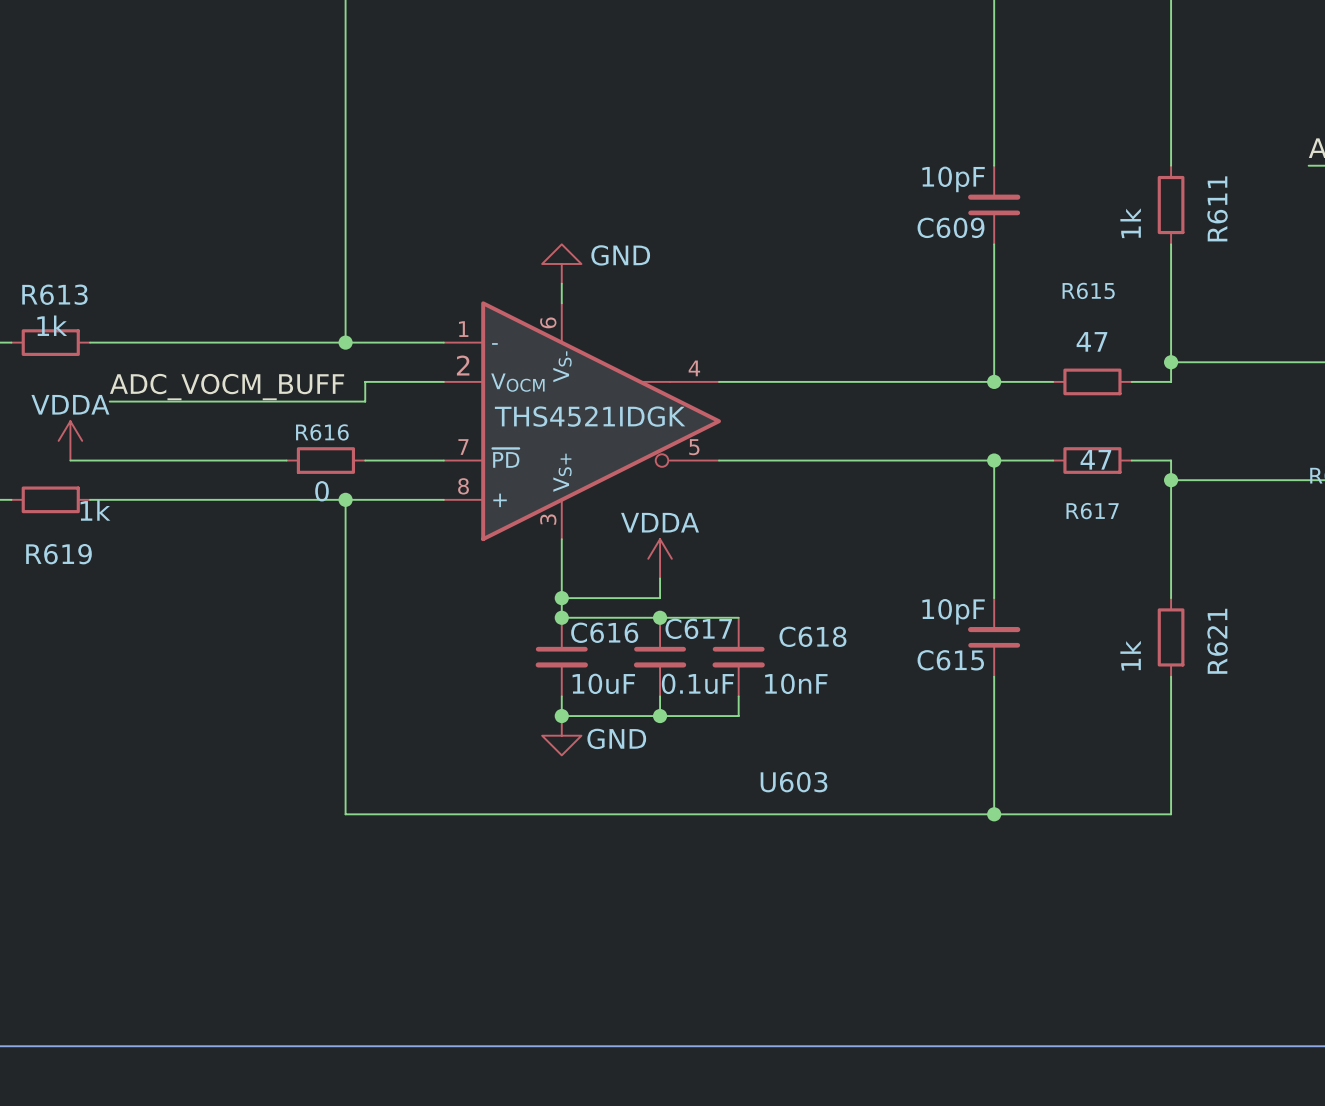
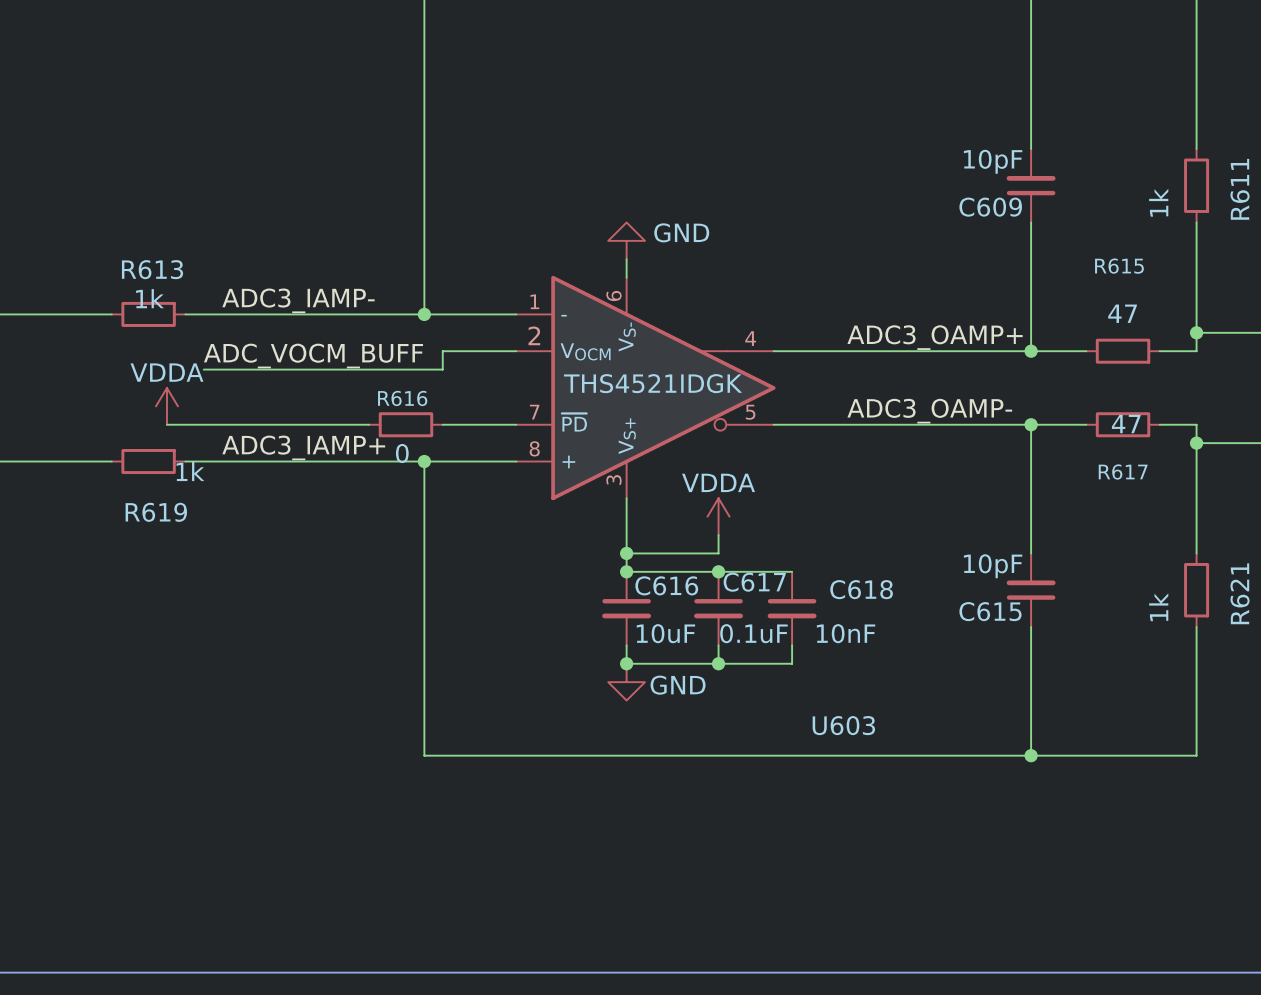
label: none -> ADC3_IAMP- (298, 300)
label: none -> ADC3_OAMP+ (935, 337)
label: none -> ADC3_OAMP- (929, 411)
label: none -> ADC3_IAMP+ (303, 447)

